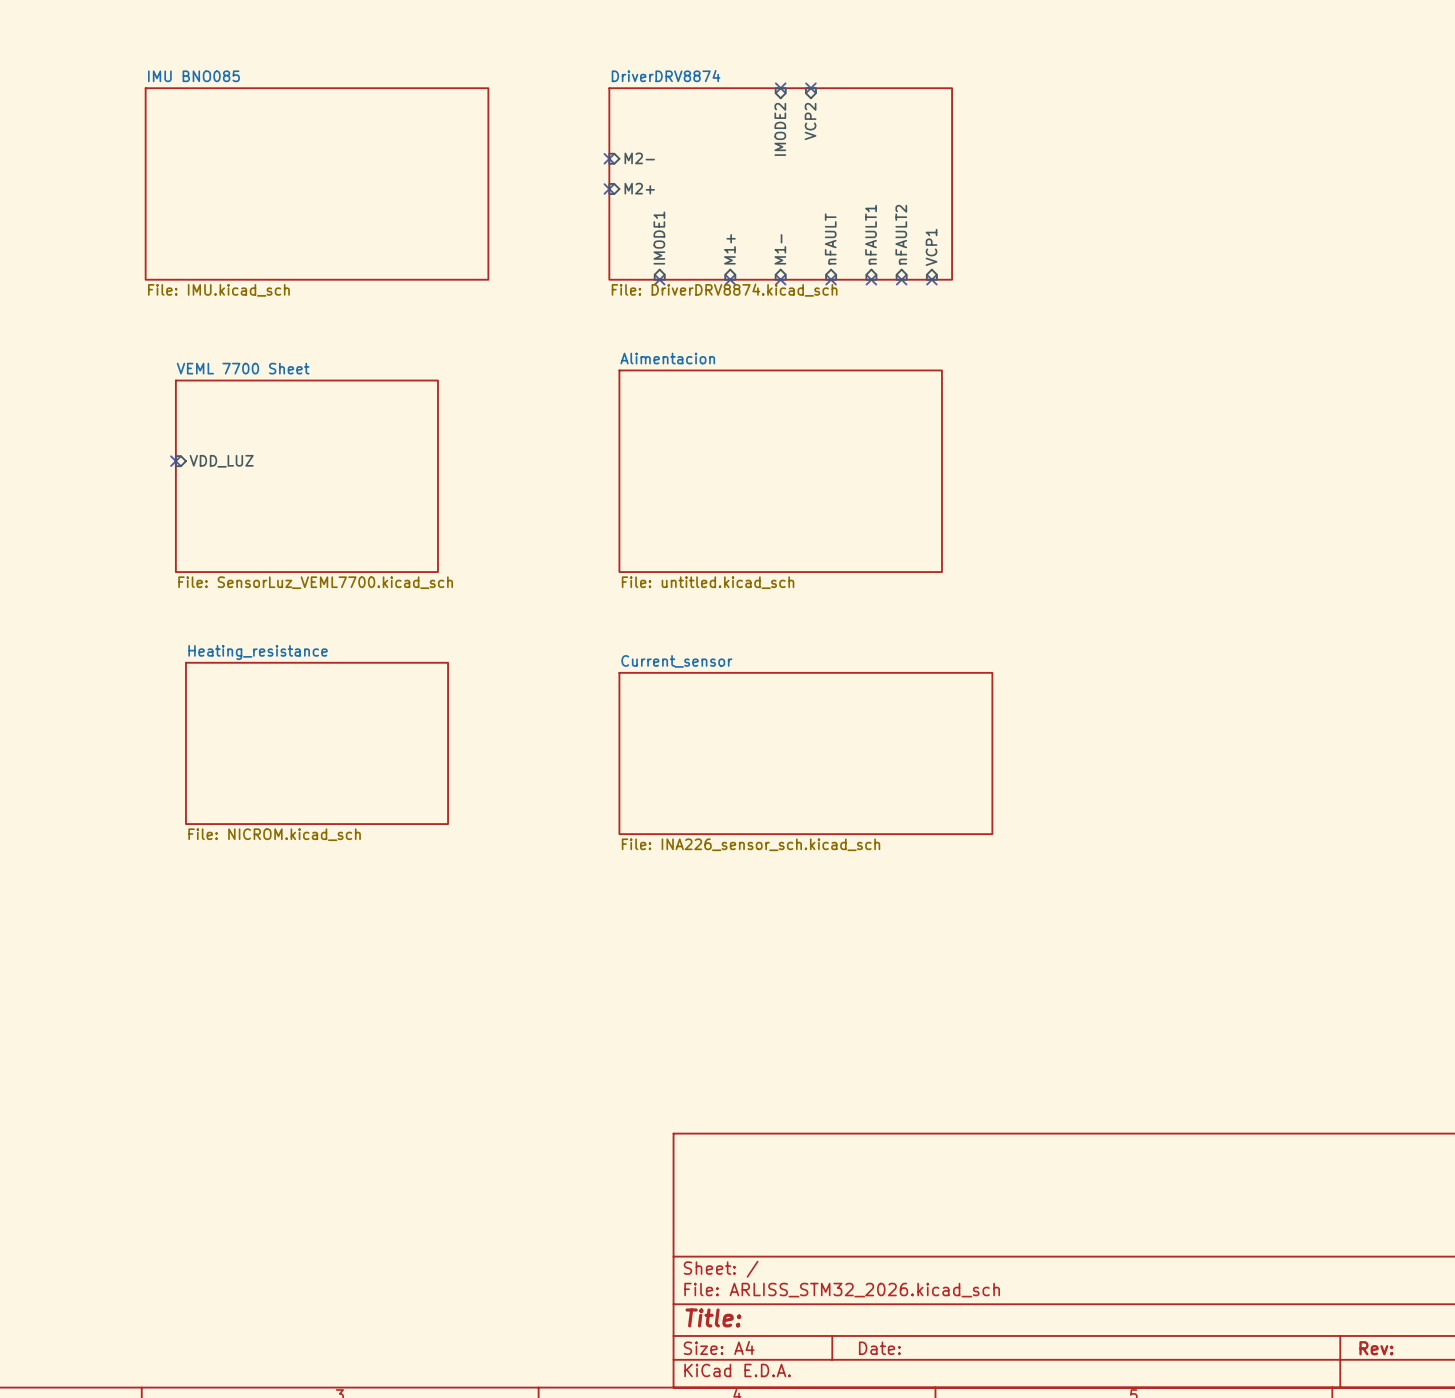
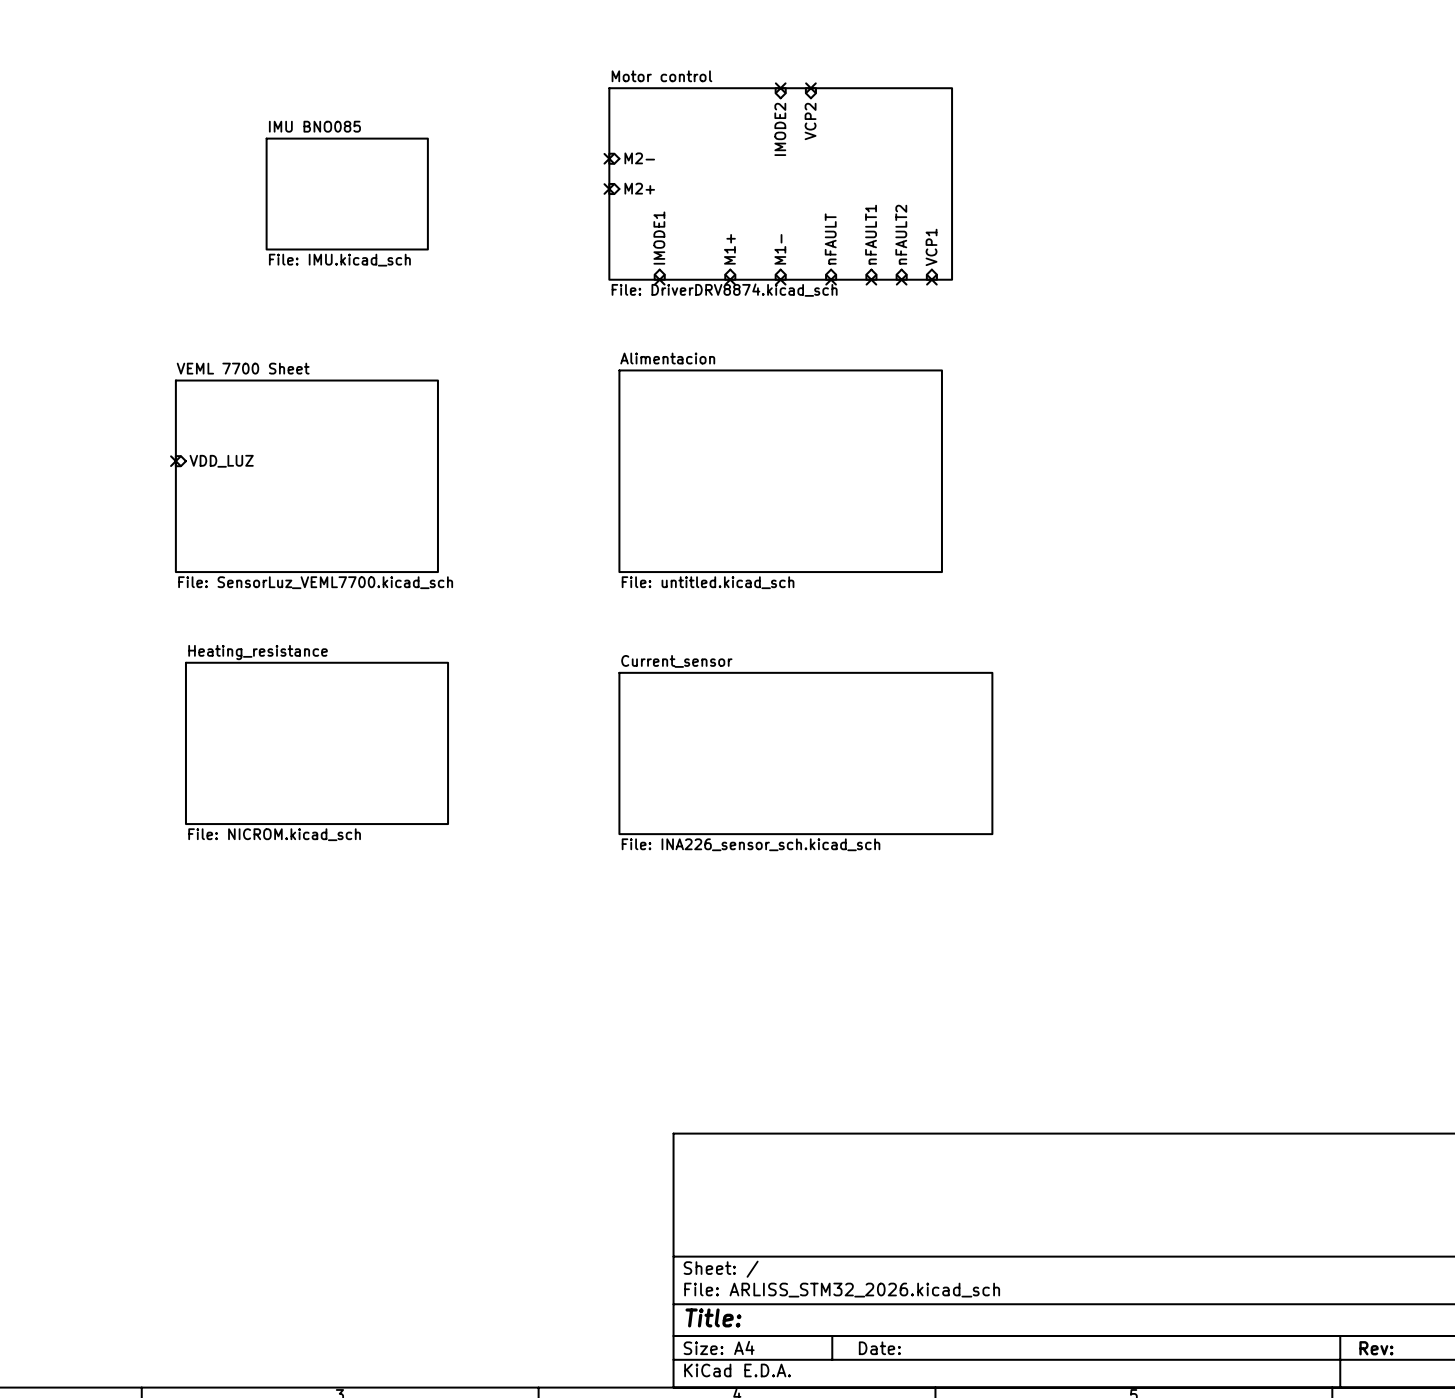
sheet IMU BNO085 name position: IMU BNO085 (193, 76) -> IMU BNO085 (314, 126)
sheet DriverDRV8874 name: DriverDRV8874 (666, 76) -> Motor control (661, 76)
sheet IMU BNO085 shape: [145, 87, 489, 281] -> [266, 138, 429, 251]
sheet IMU BNO085 value position: File: IMU.kicad_sch (218, 290) -> File: IMU.kicad_sch (339, 260)

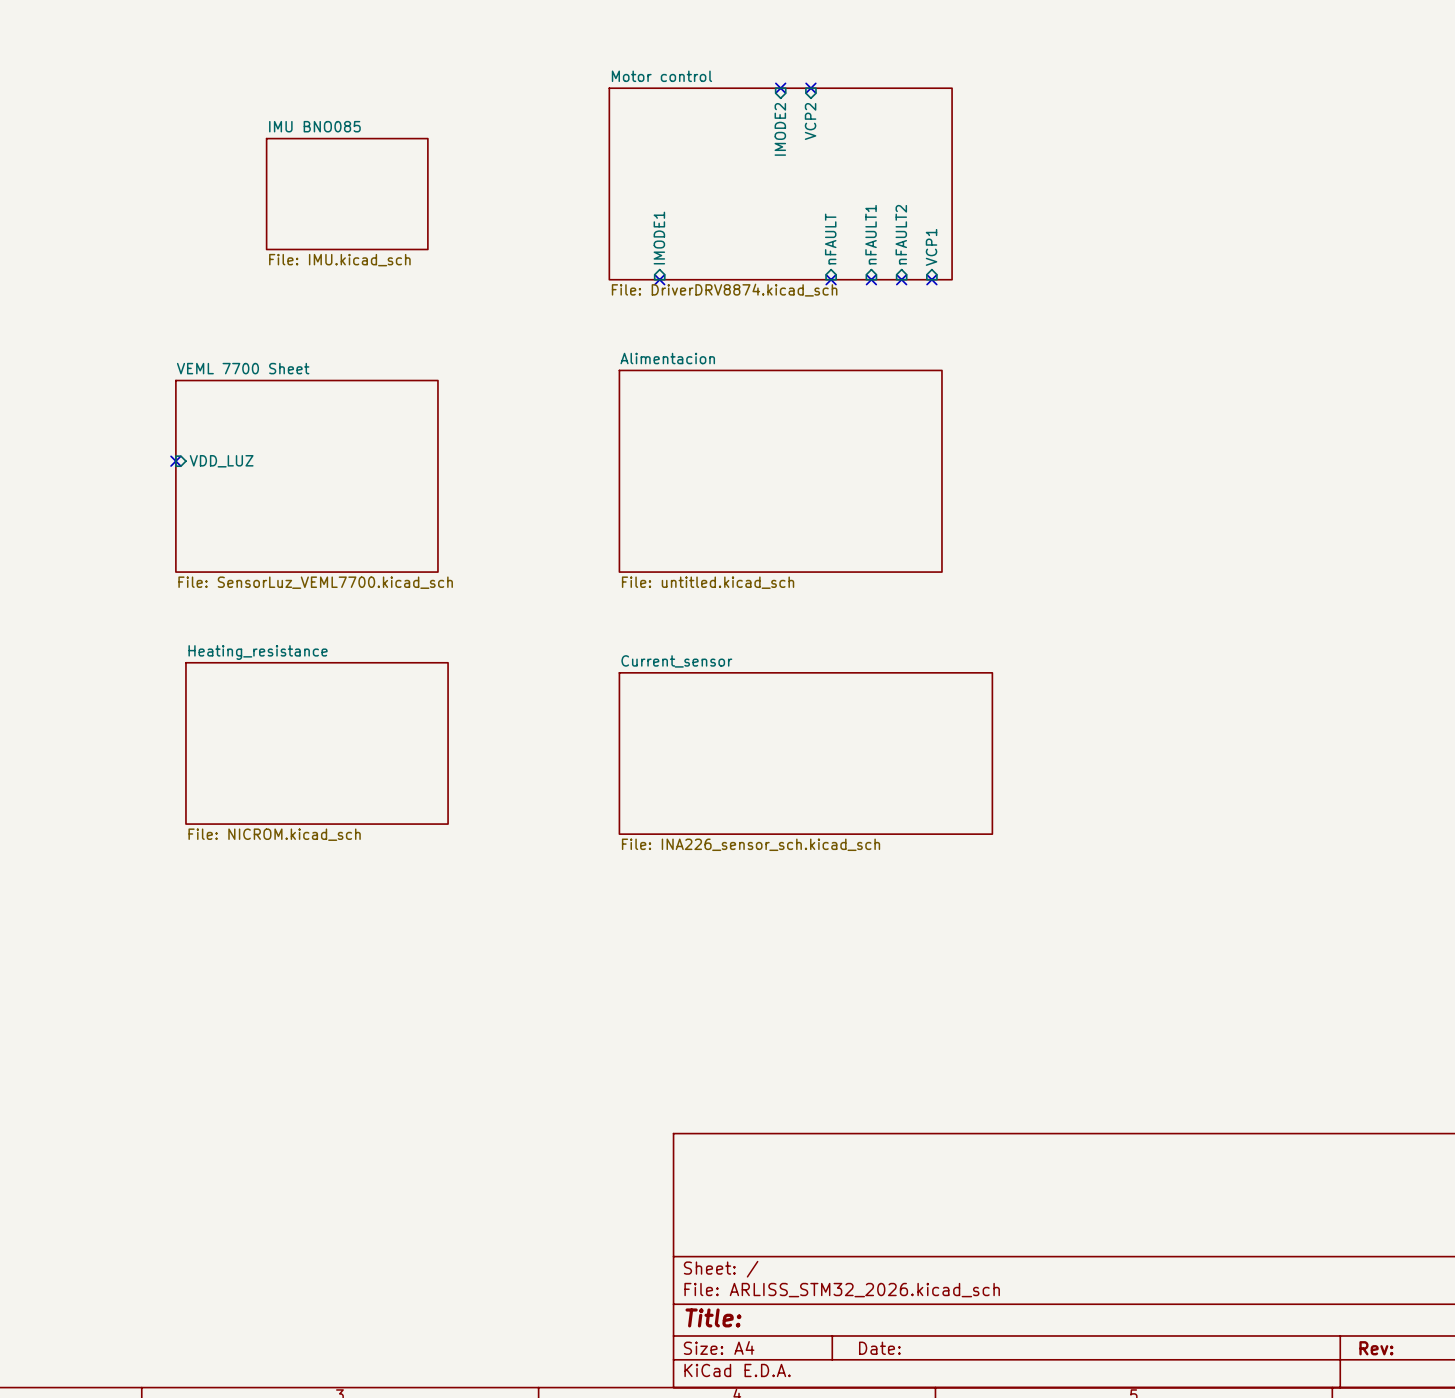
no-connect mark: (609, 158) -> none
sheet pin: M2- (639, 158) -> none
sheet pin: M2+ (639, 188) -> none
no-connect mark: (609, 189) -> none
sheet pin: M1+ (729, 249) -> none
sheet pin: M1- (780, 249) -> none
no-connect mark: (730, 279) -> none
no-connect mark: (780, 279) -> none

